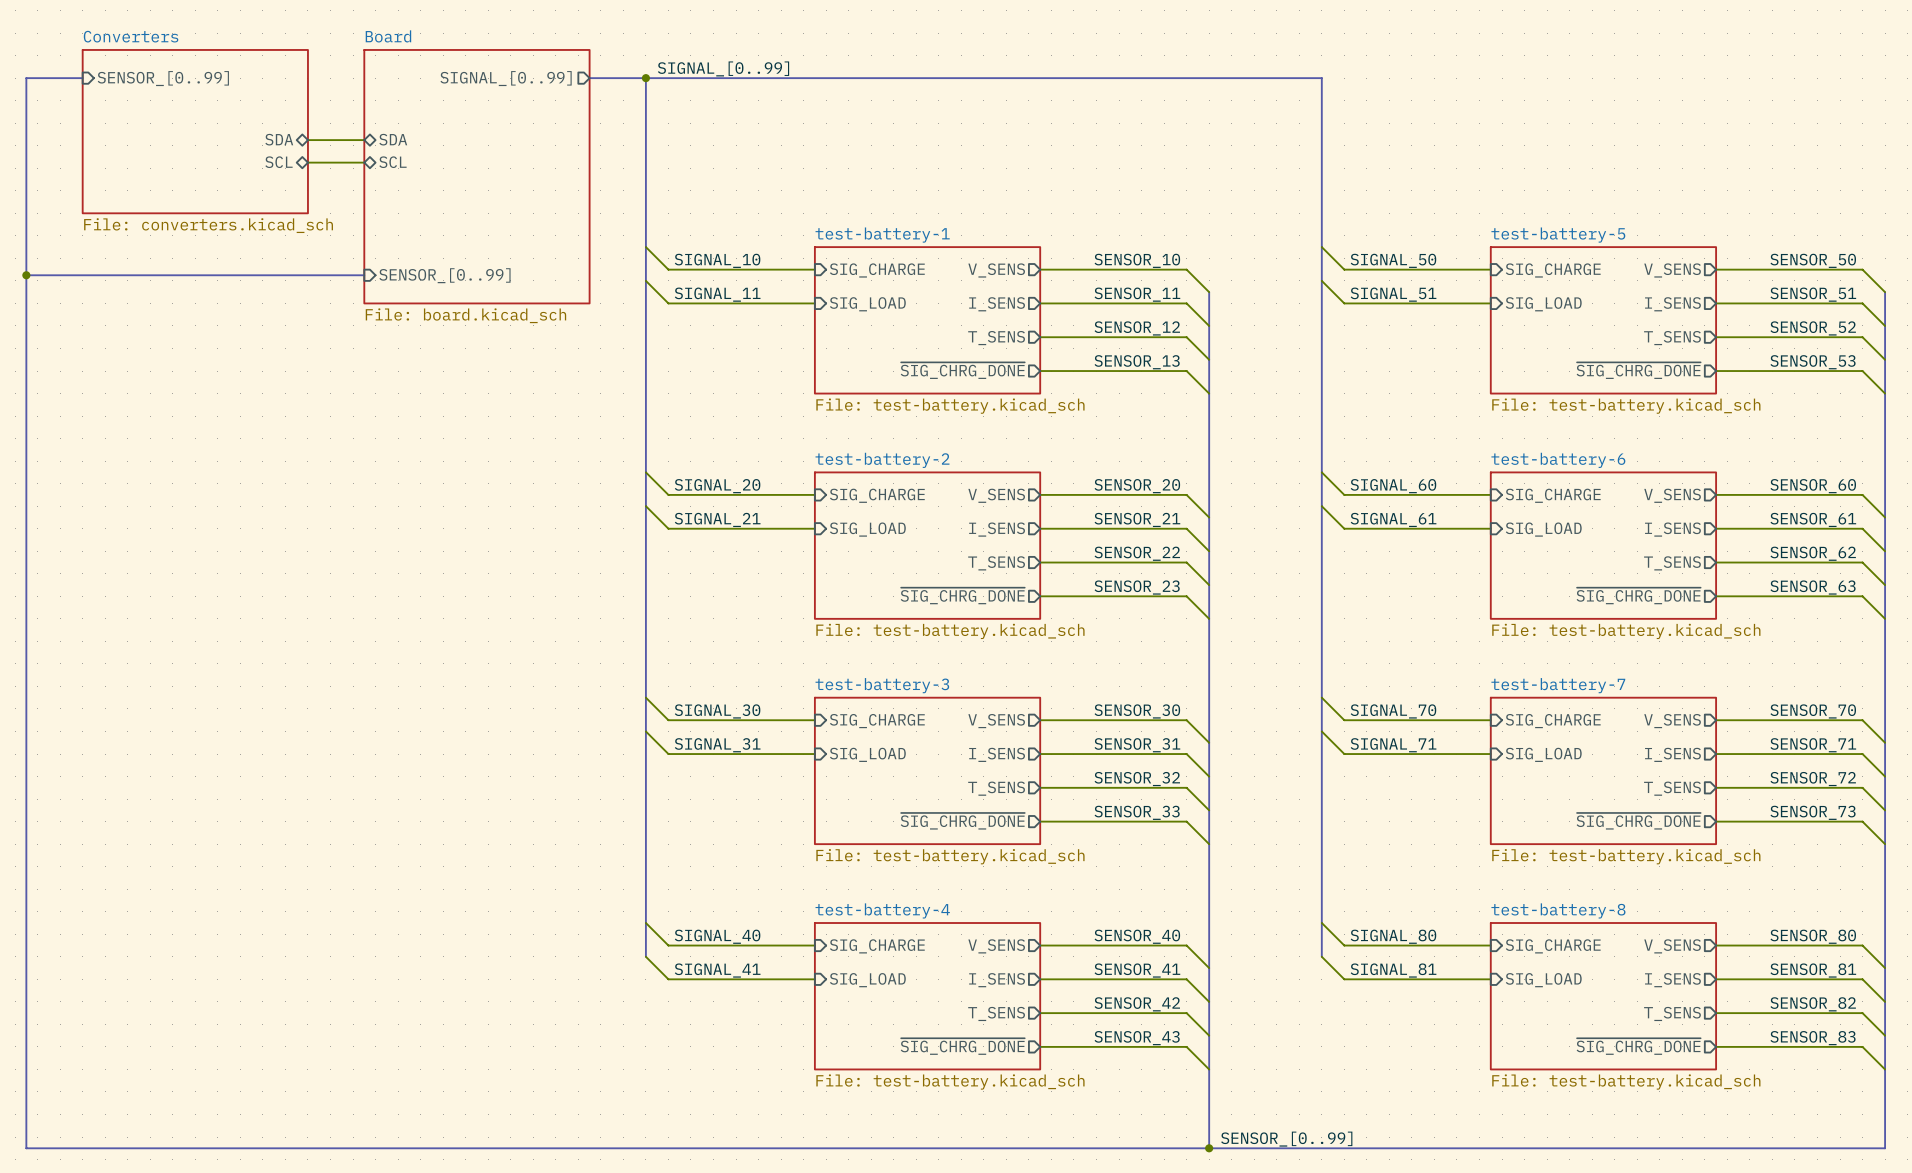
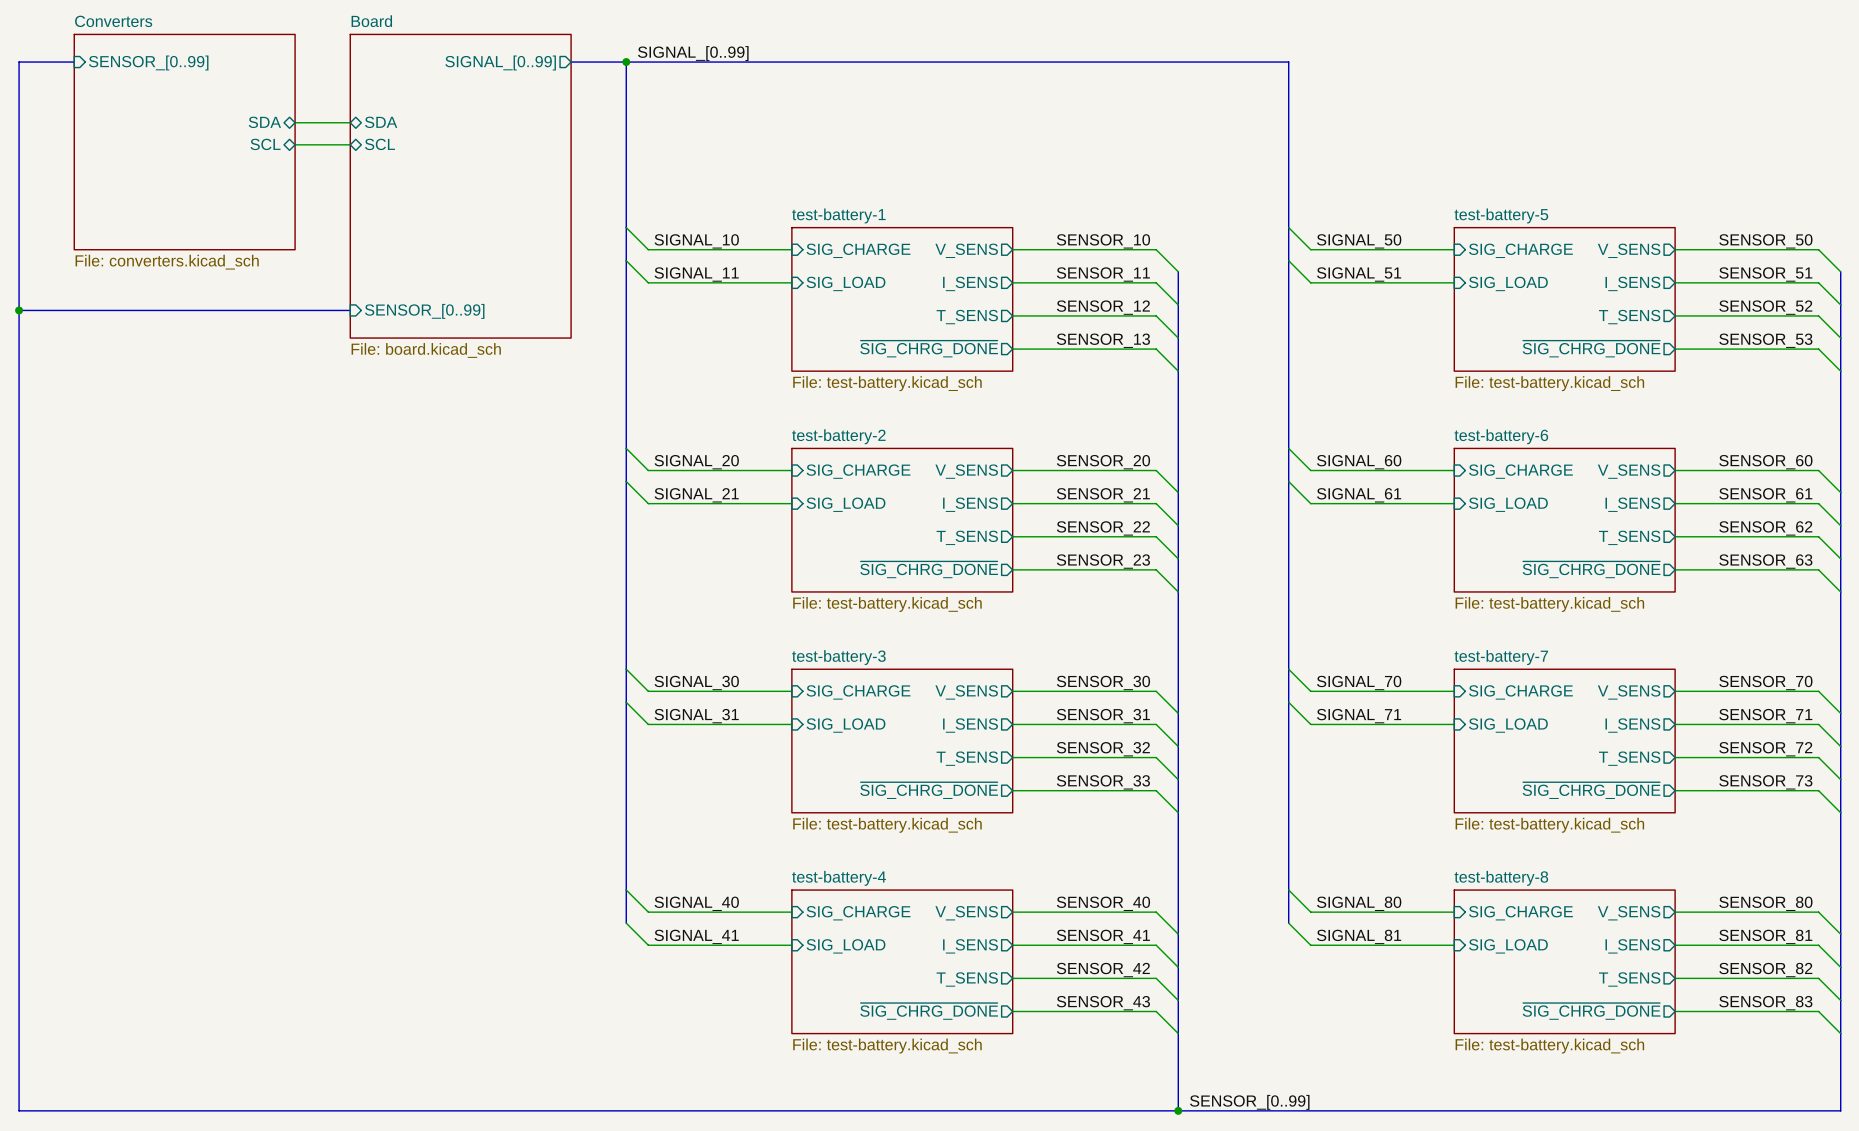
sheet Converters: File: converters.kicad_sch (195, 131) -> none
sheet Converters: none -> File: converters.kicad_sch (184, 142)
sheet Board: File: board.kicad_sch (476, 176) -> none
sheet Board: none -> File: board.kicad_sch (460, 186)
bus: (26, 275) (364, 275) -> (19, 310) (350, 310)
junction: (26, 275) -> none
sheet pin position: SENSOR_[0..99] (444, 275) -> SENSOR_[0..99] (424, 311)
junction: none -> (19, 310)

